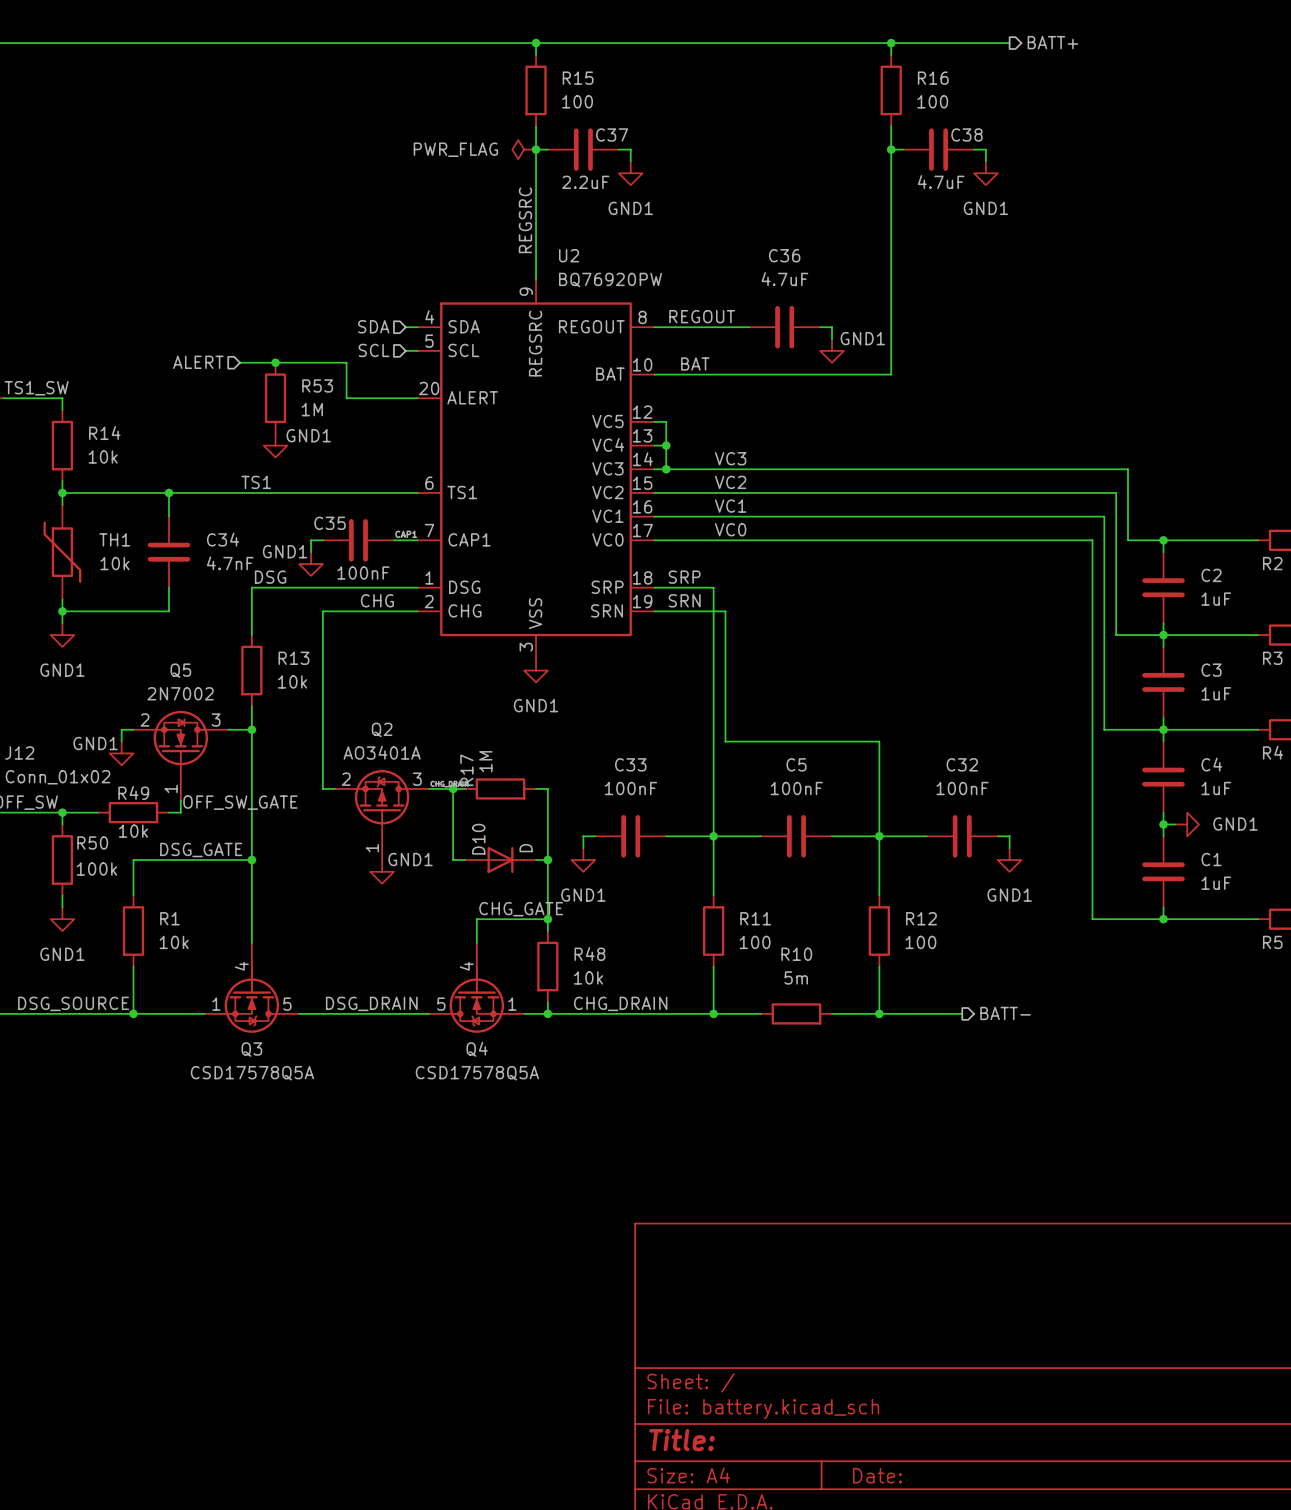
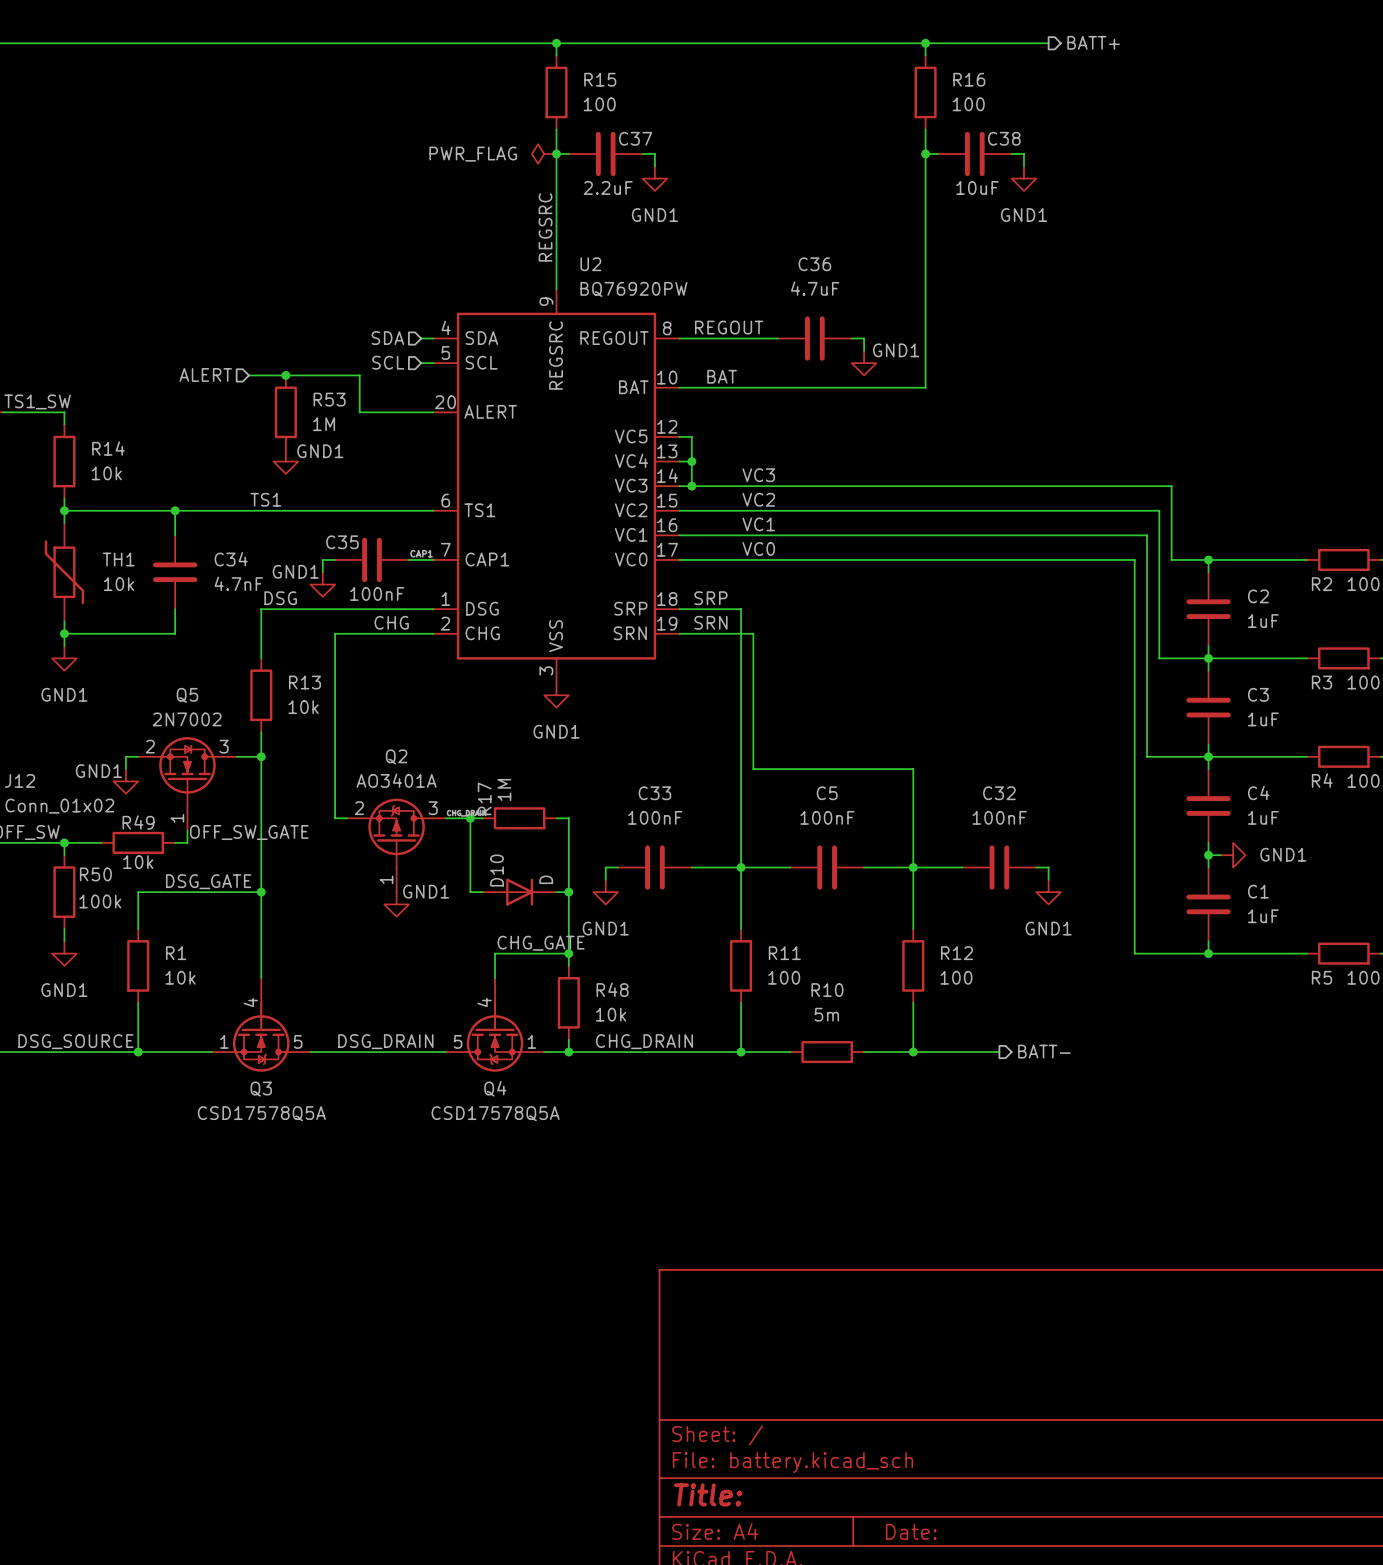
C38 value: 4.7uF (941, 182) -> 10uF (977, 187)

